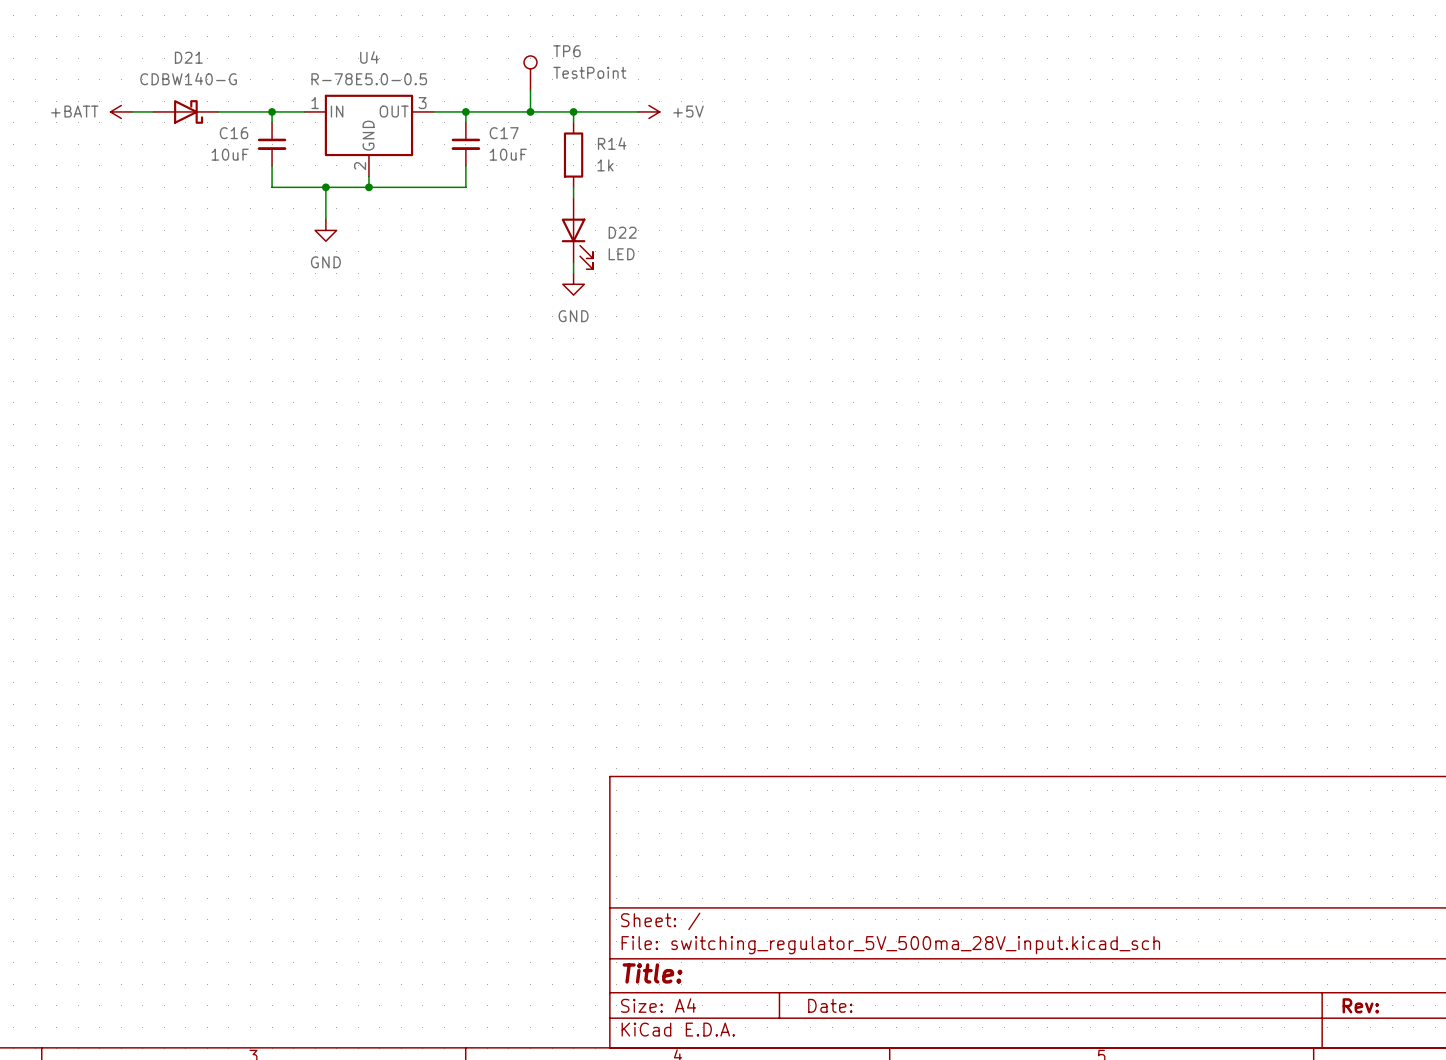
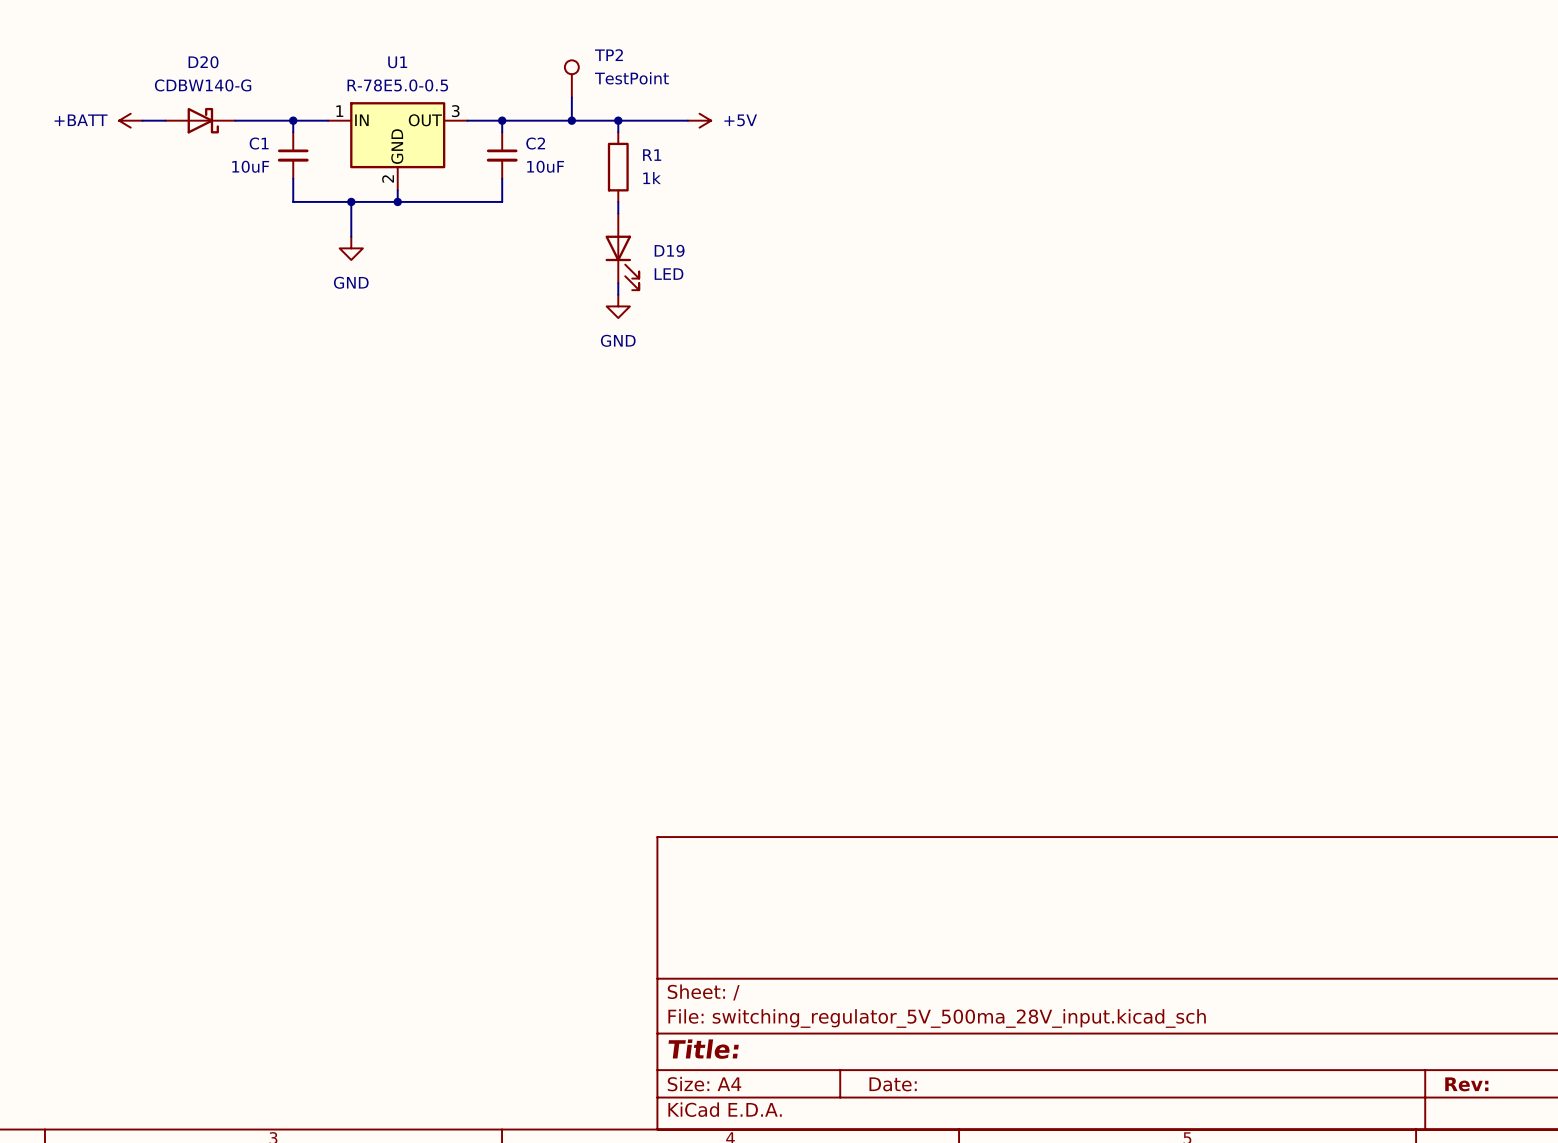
TP6 name: TP6 (566, 51) -> TP2 (608, 55)
D21 name: D21 (188, 57) -> D20 (203, 62)
U4 name: U4 (369, 57) -> U1 (397, 62)
C16 name: C16 (234, 133) -> C1 (259, 143)
C17 name: C17 (504, 133) -> C2 (535, 143)
R14 name: R14 (612, 143) -> R1 (652, 155)
D22 name: D22 (622, 232) -> D19 (669, 250)

